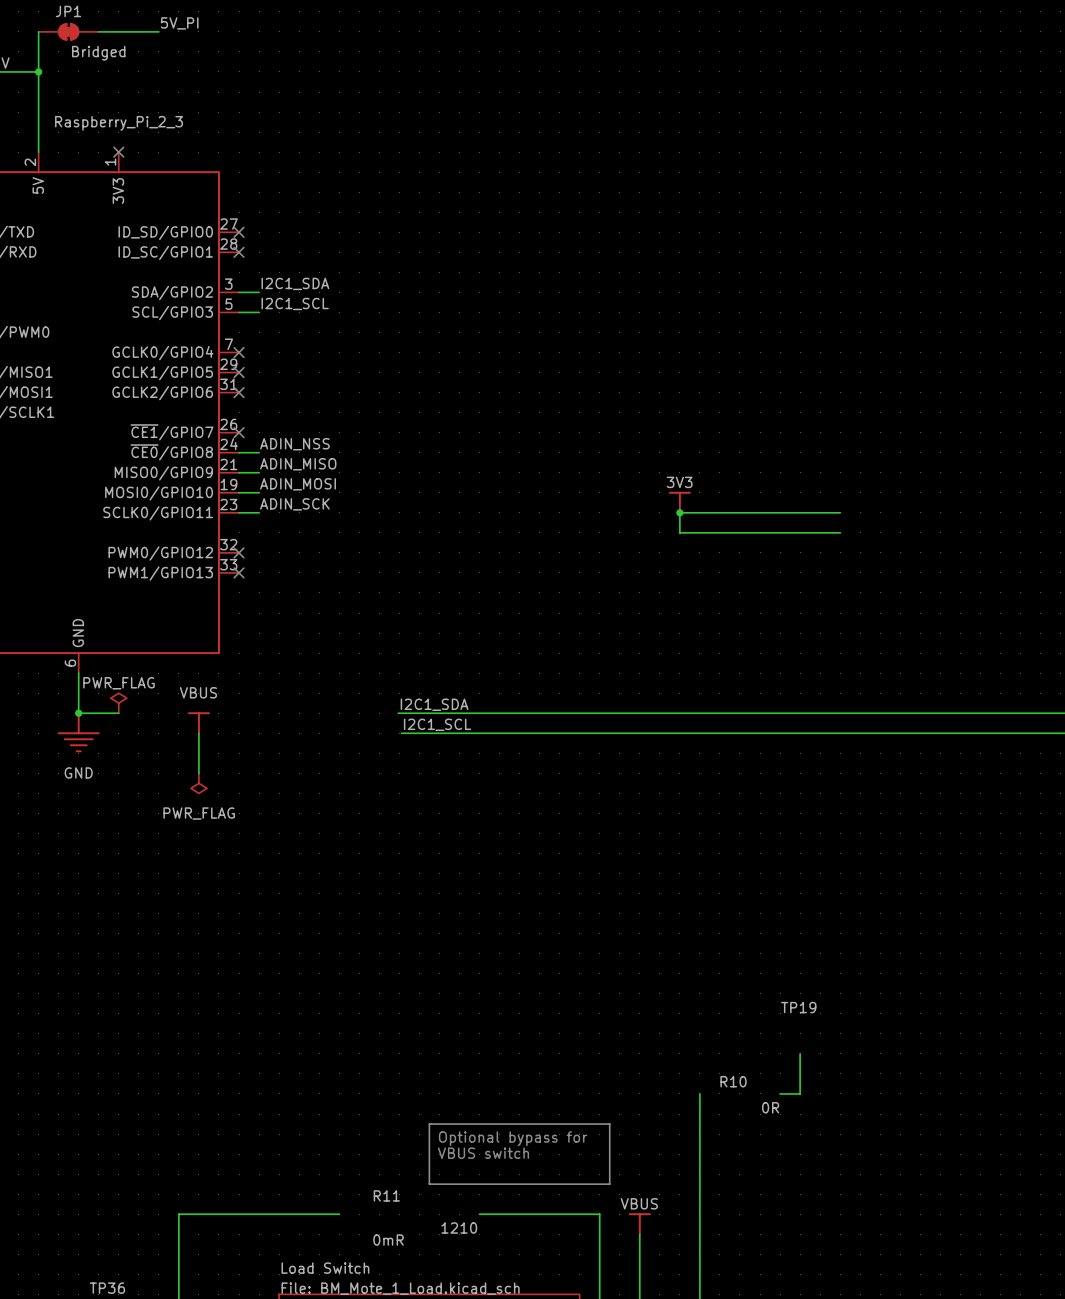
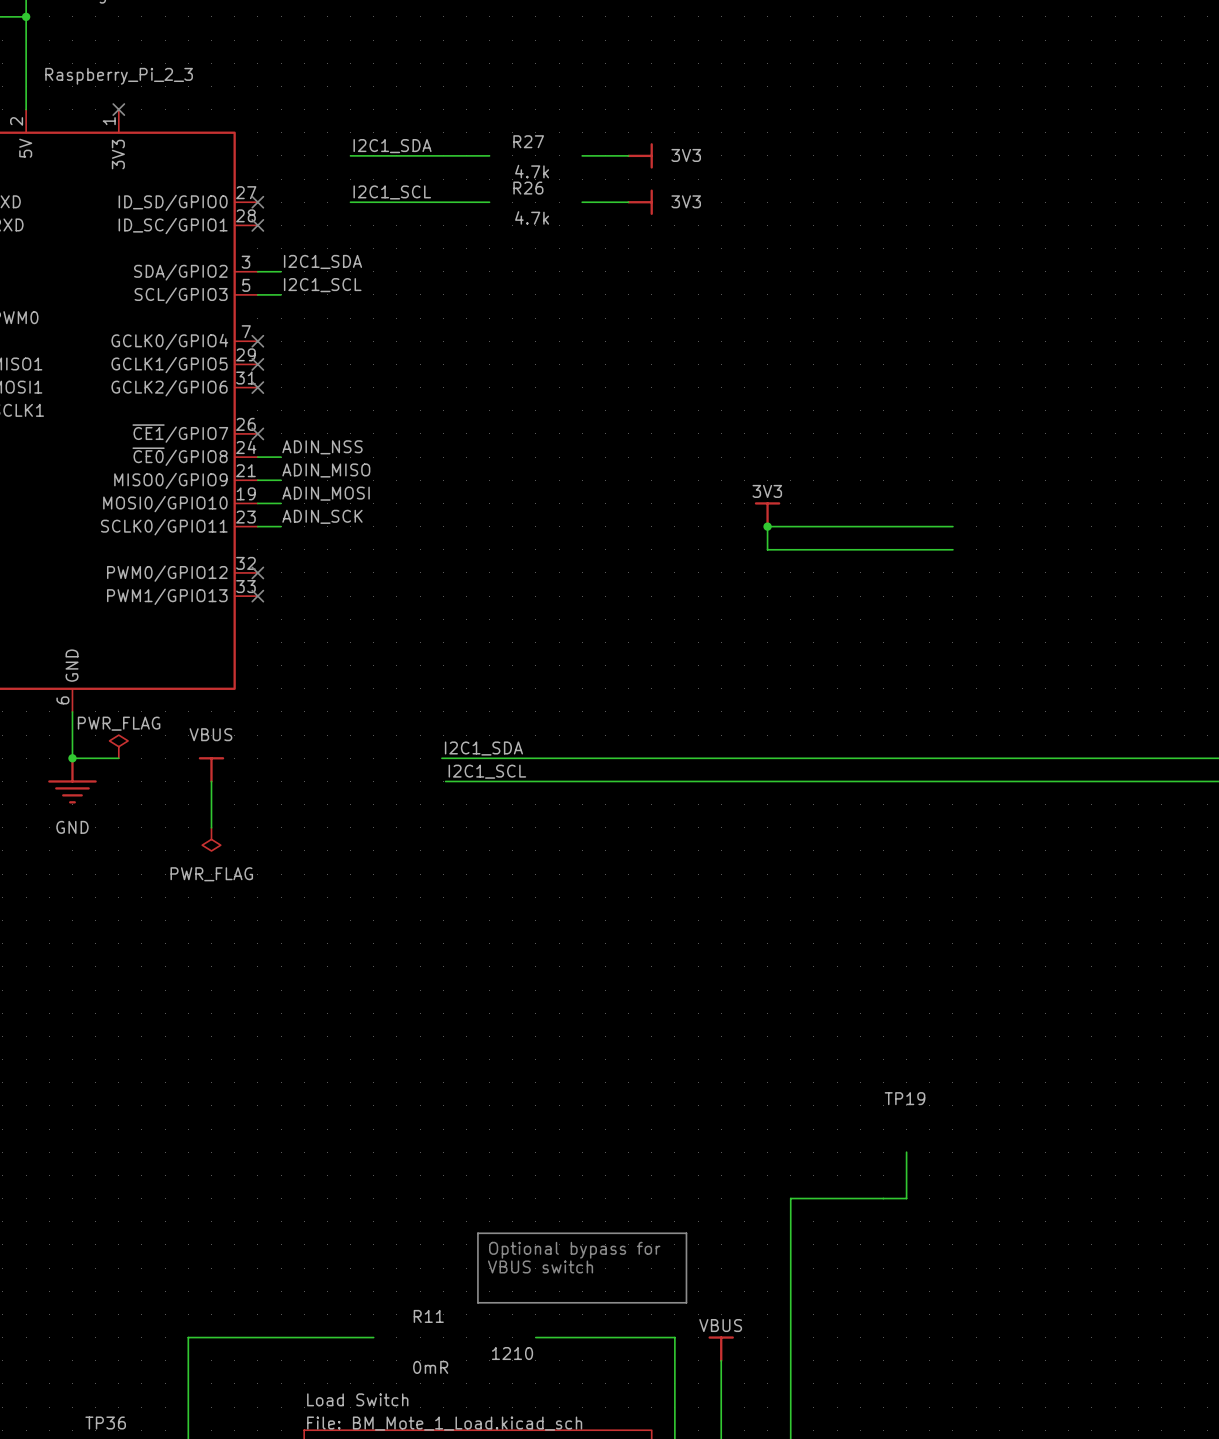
label: none -> I2C1_SDA (392, 146)
wire: none -> (350, 155) (489, 155)
R27: none -> (531, 156)
wire: none -> (582, 155) (628, 155)
power symbol: none -> 3V3 (640, 155)
label: none -> I2C1_SCL (392, 192)
wire: none -> (350, 202) (489, 202)
wire: none -> (582, 202) (628, 202)
power symbol: none -> 3V3 (640, 202)
R26: none -> (531, 203)
wire: none -> (790, 1198) (883, 1198)
R10: (749, 1094) -> none

